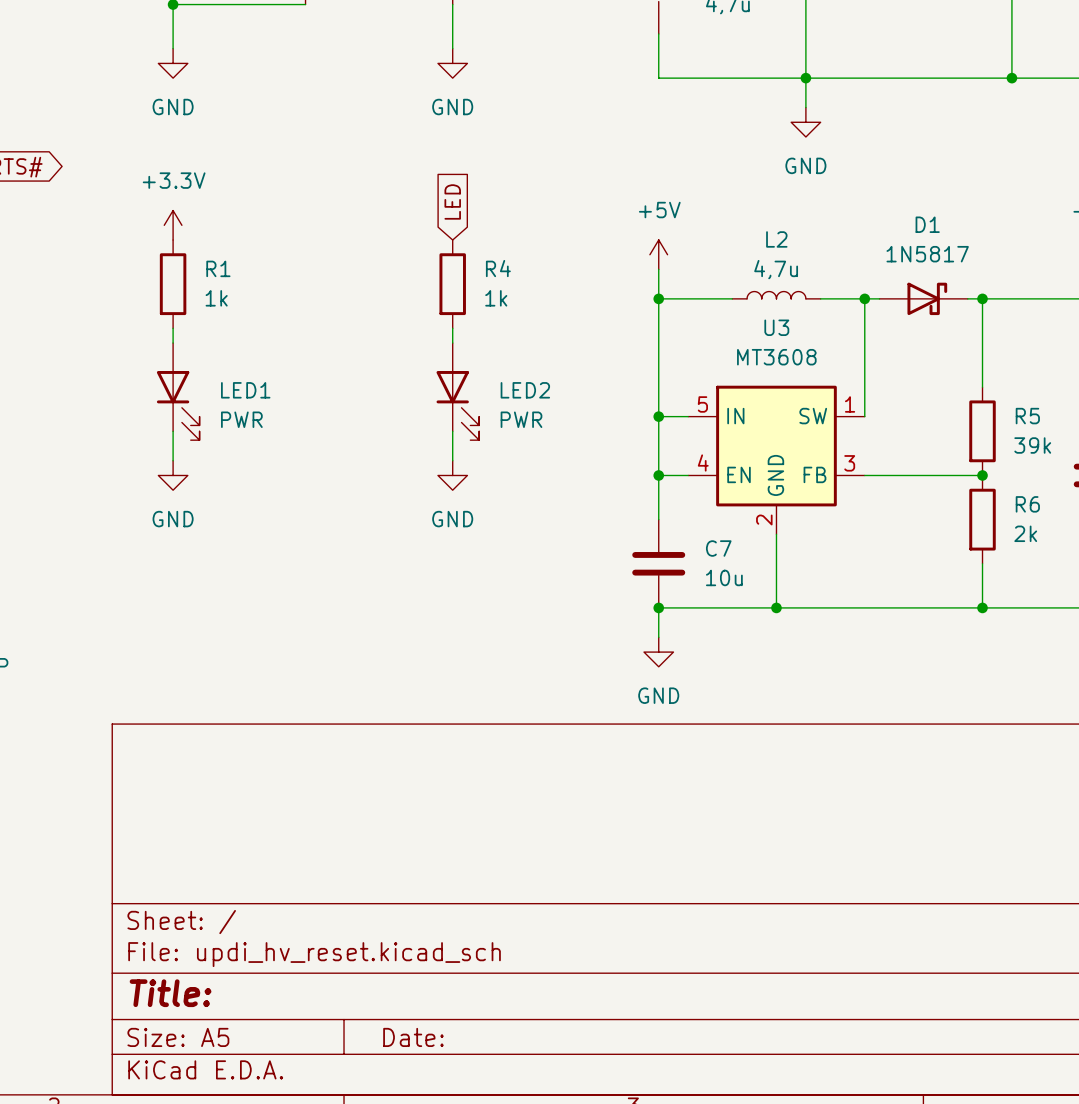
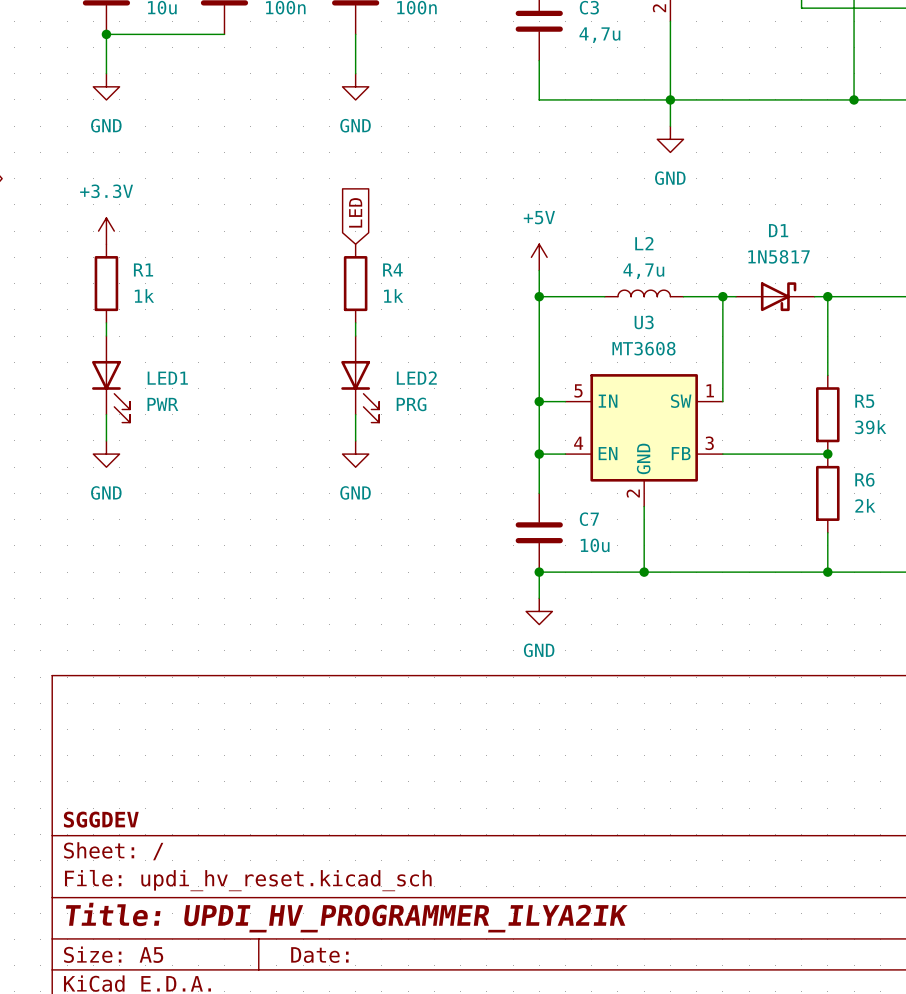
LED2 value: PWR (521, 419) -> PRG (411, 404)
title block: none -> SGGDEV (101, 819)
title block: Title: (170, 993) -> Title: UPDI_HV_PROGRAMMER_ILYA2IK (346, 917)

